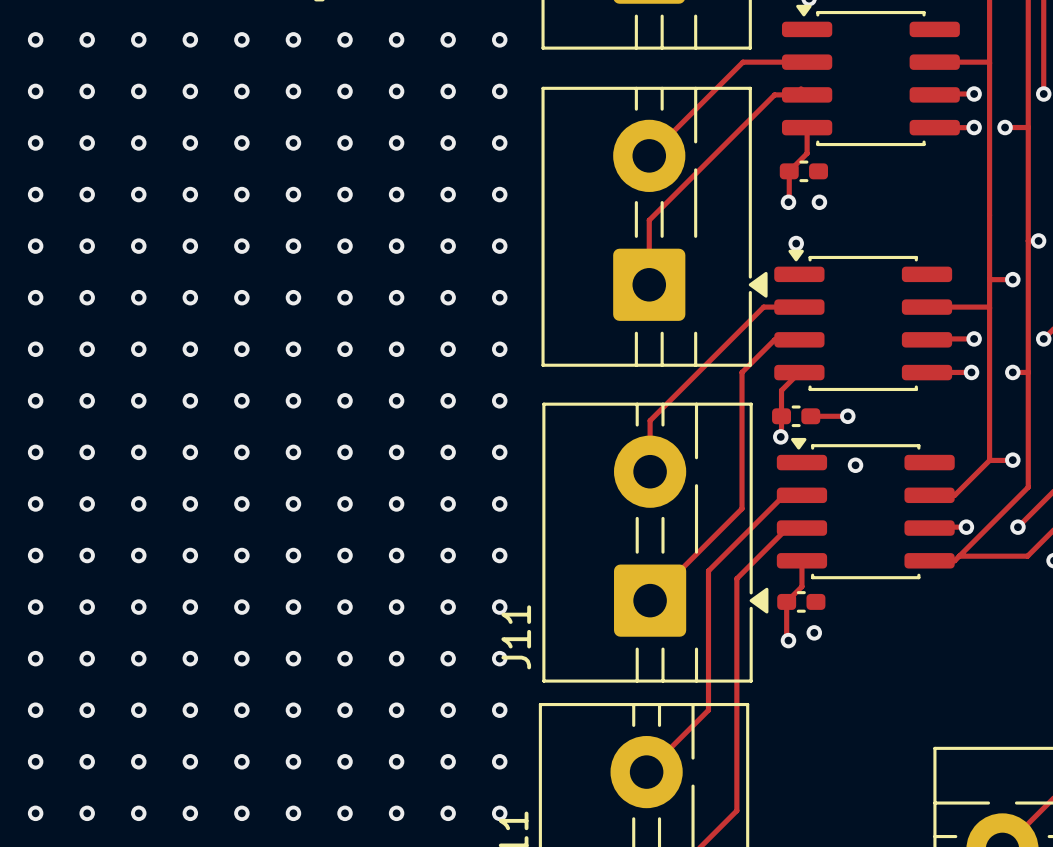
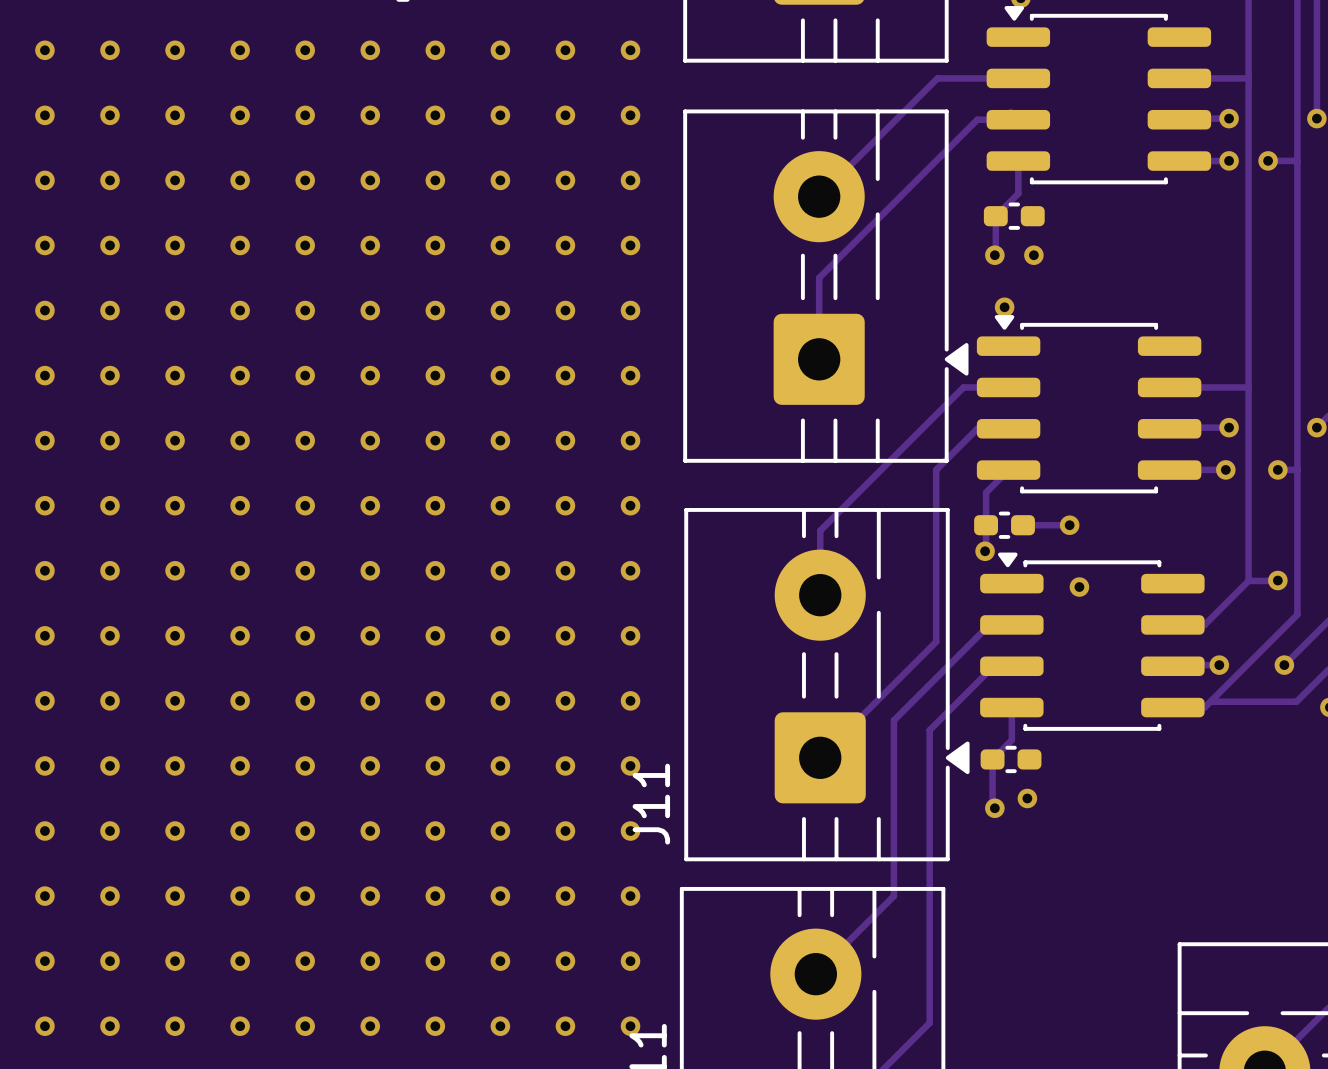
via: (1038, 240) -> none
track: (989, 279) (1012, 279) -> none
via: (1012, 279) -> none

